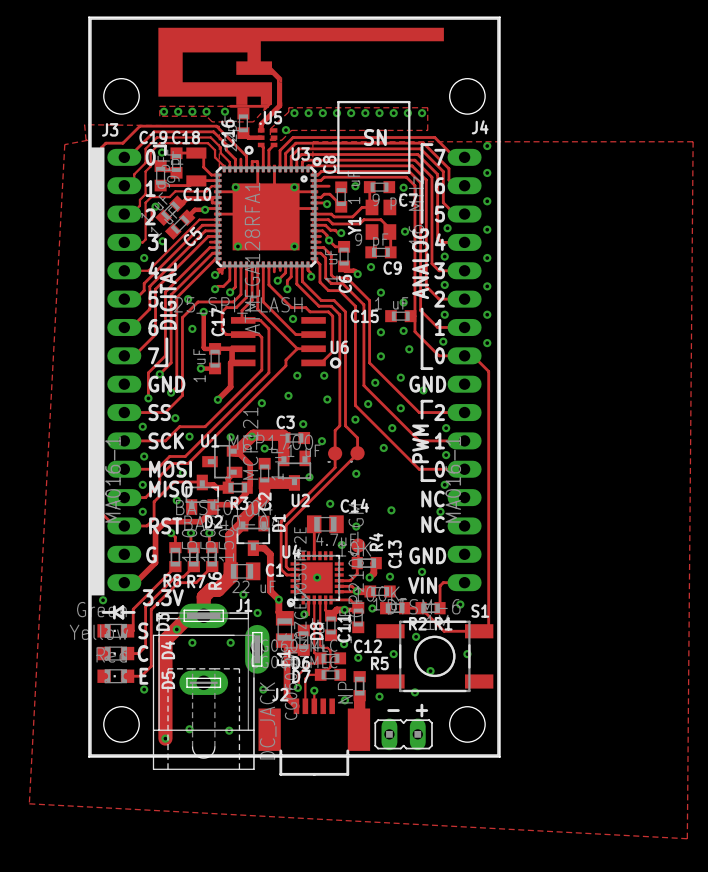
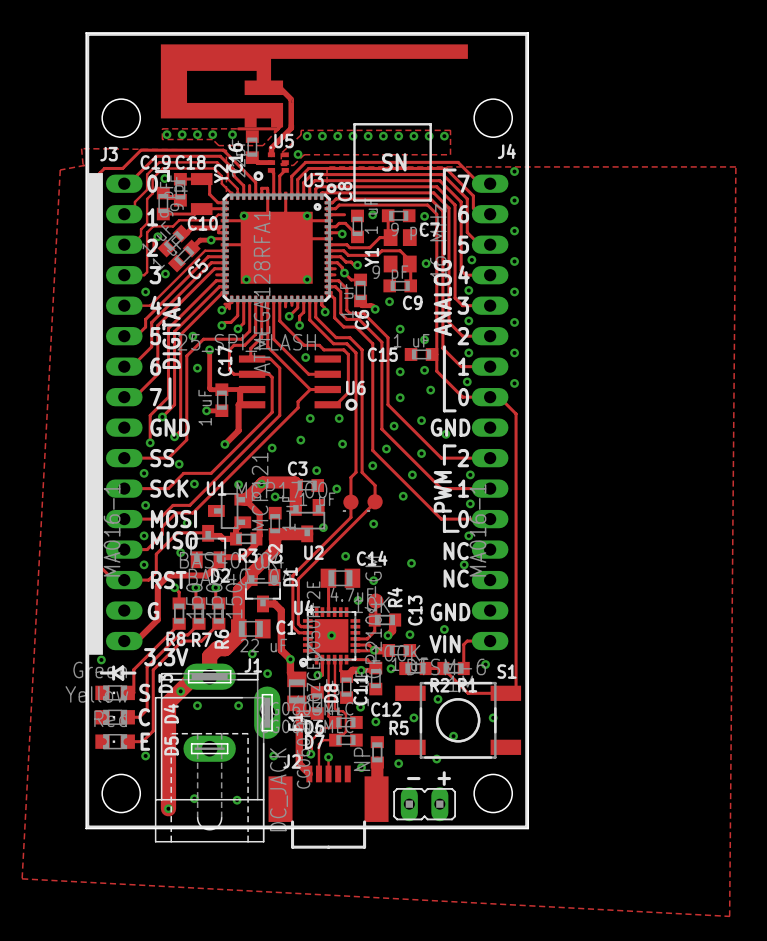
text: none -> Y2 (221, 173)
line: (165, 239) (165, 250) -> none

